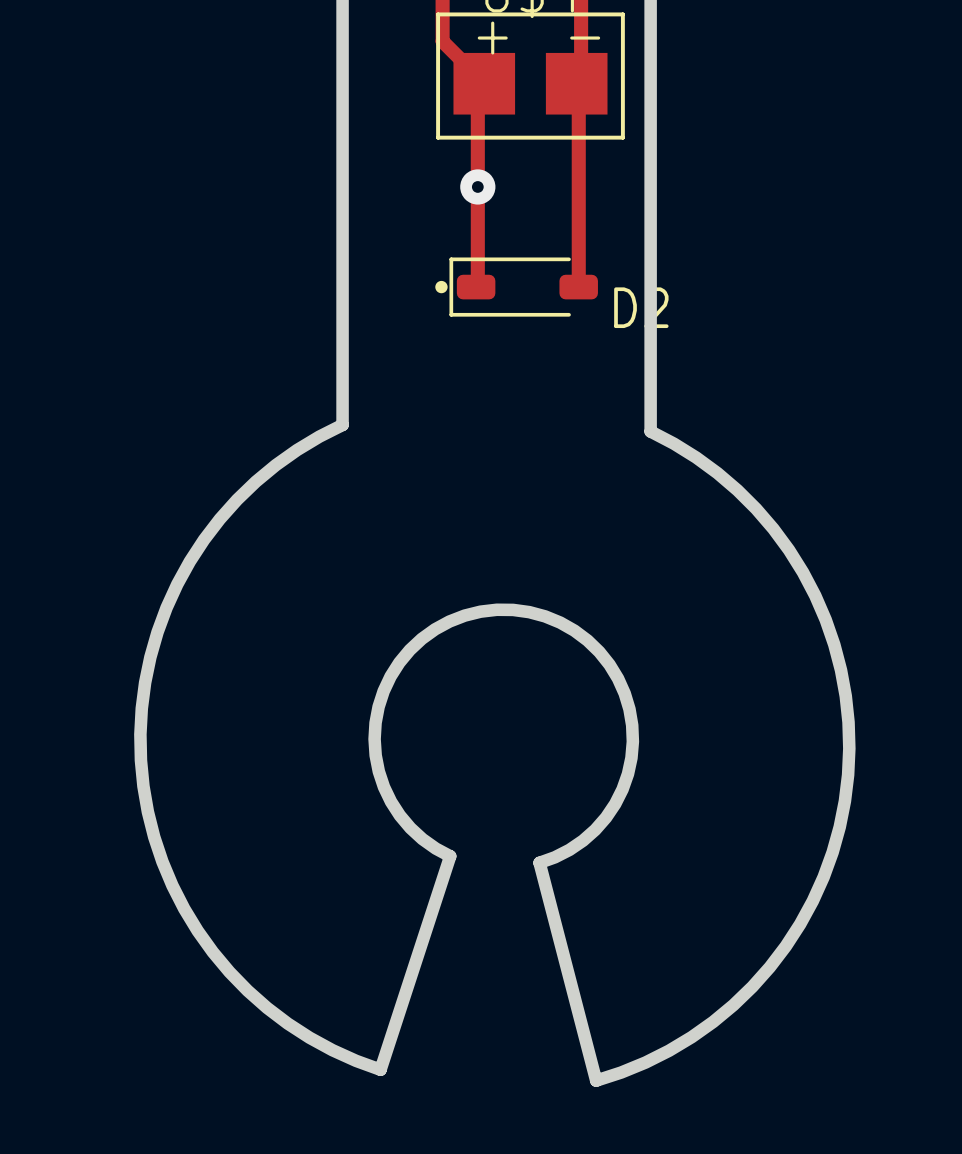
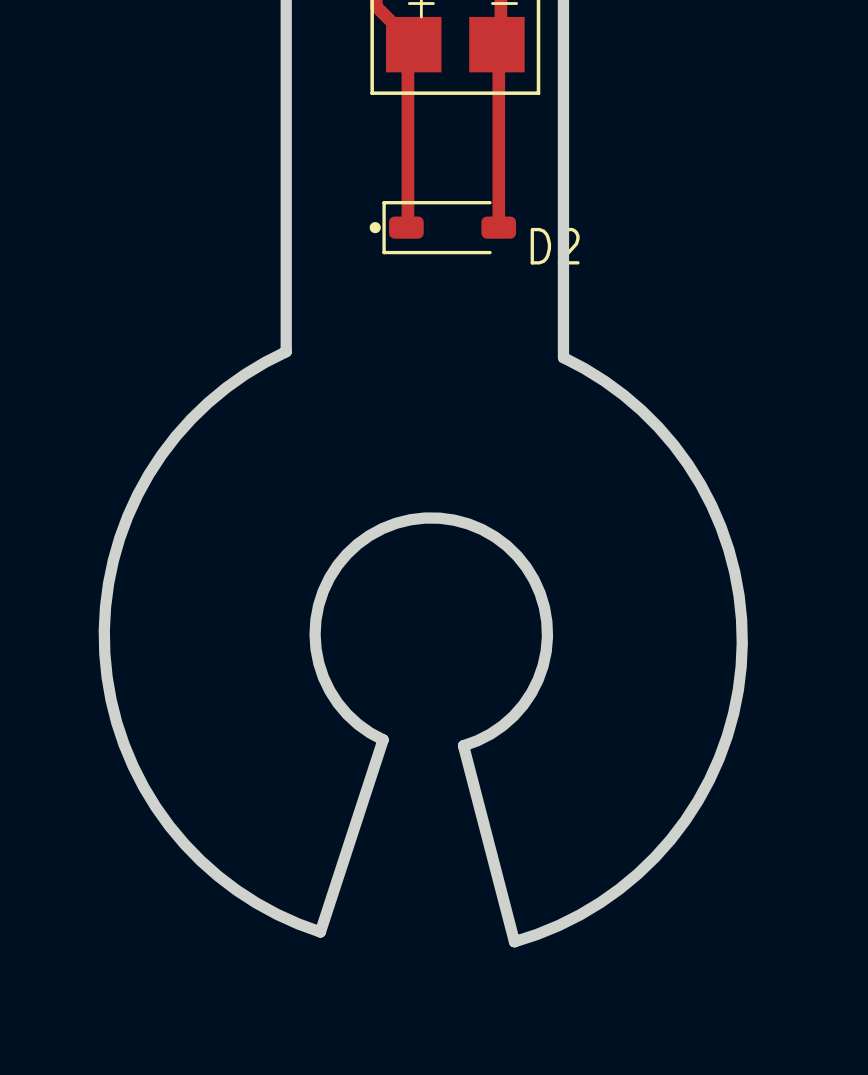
via: (477, 186) -> none

